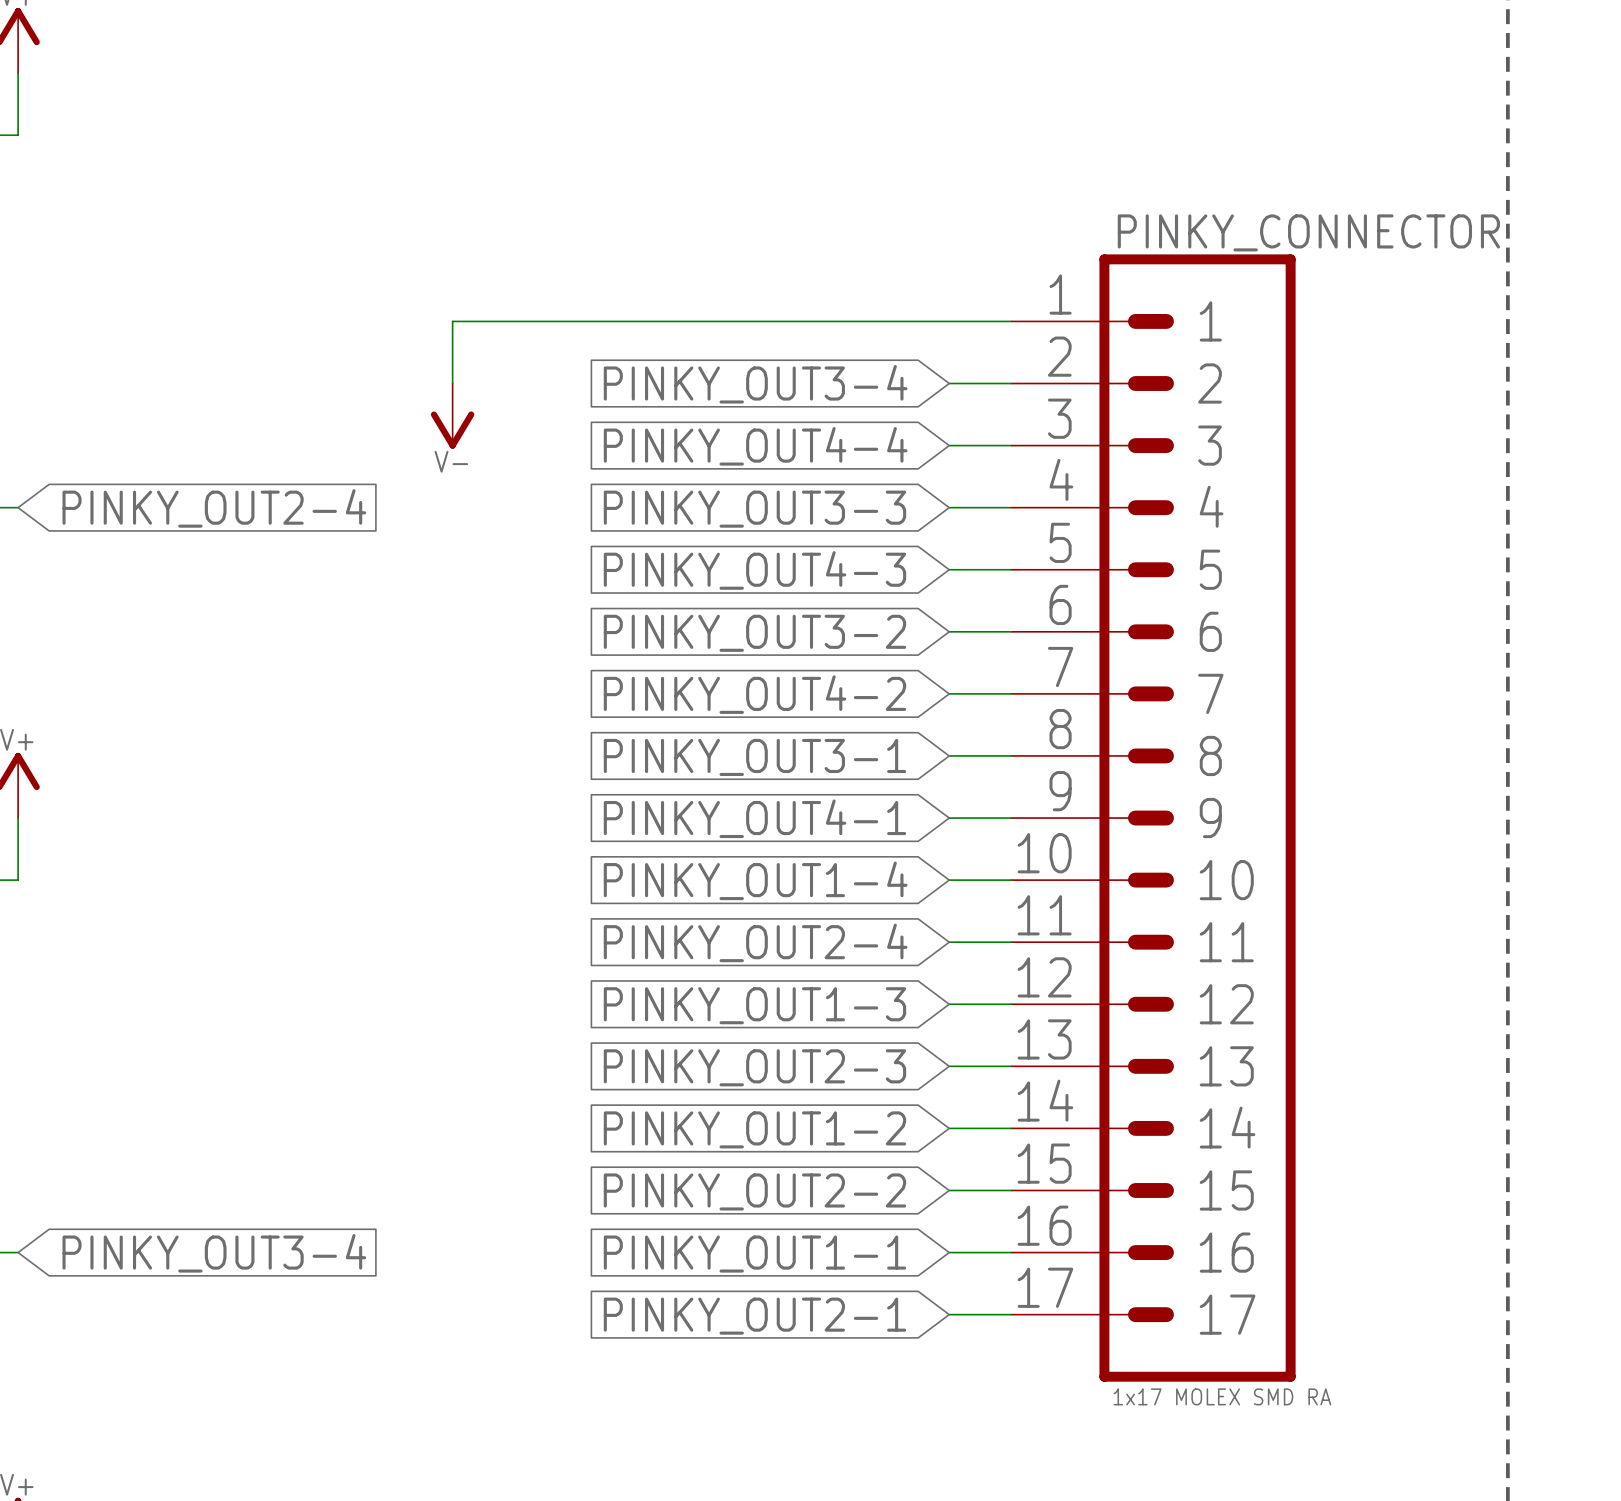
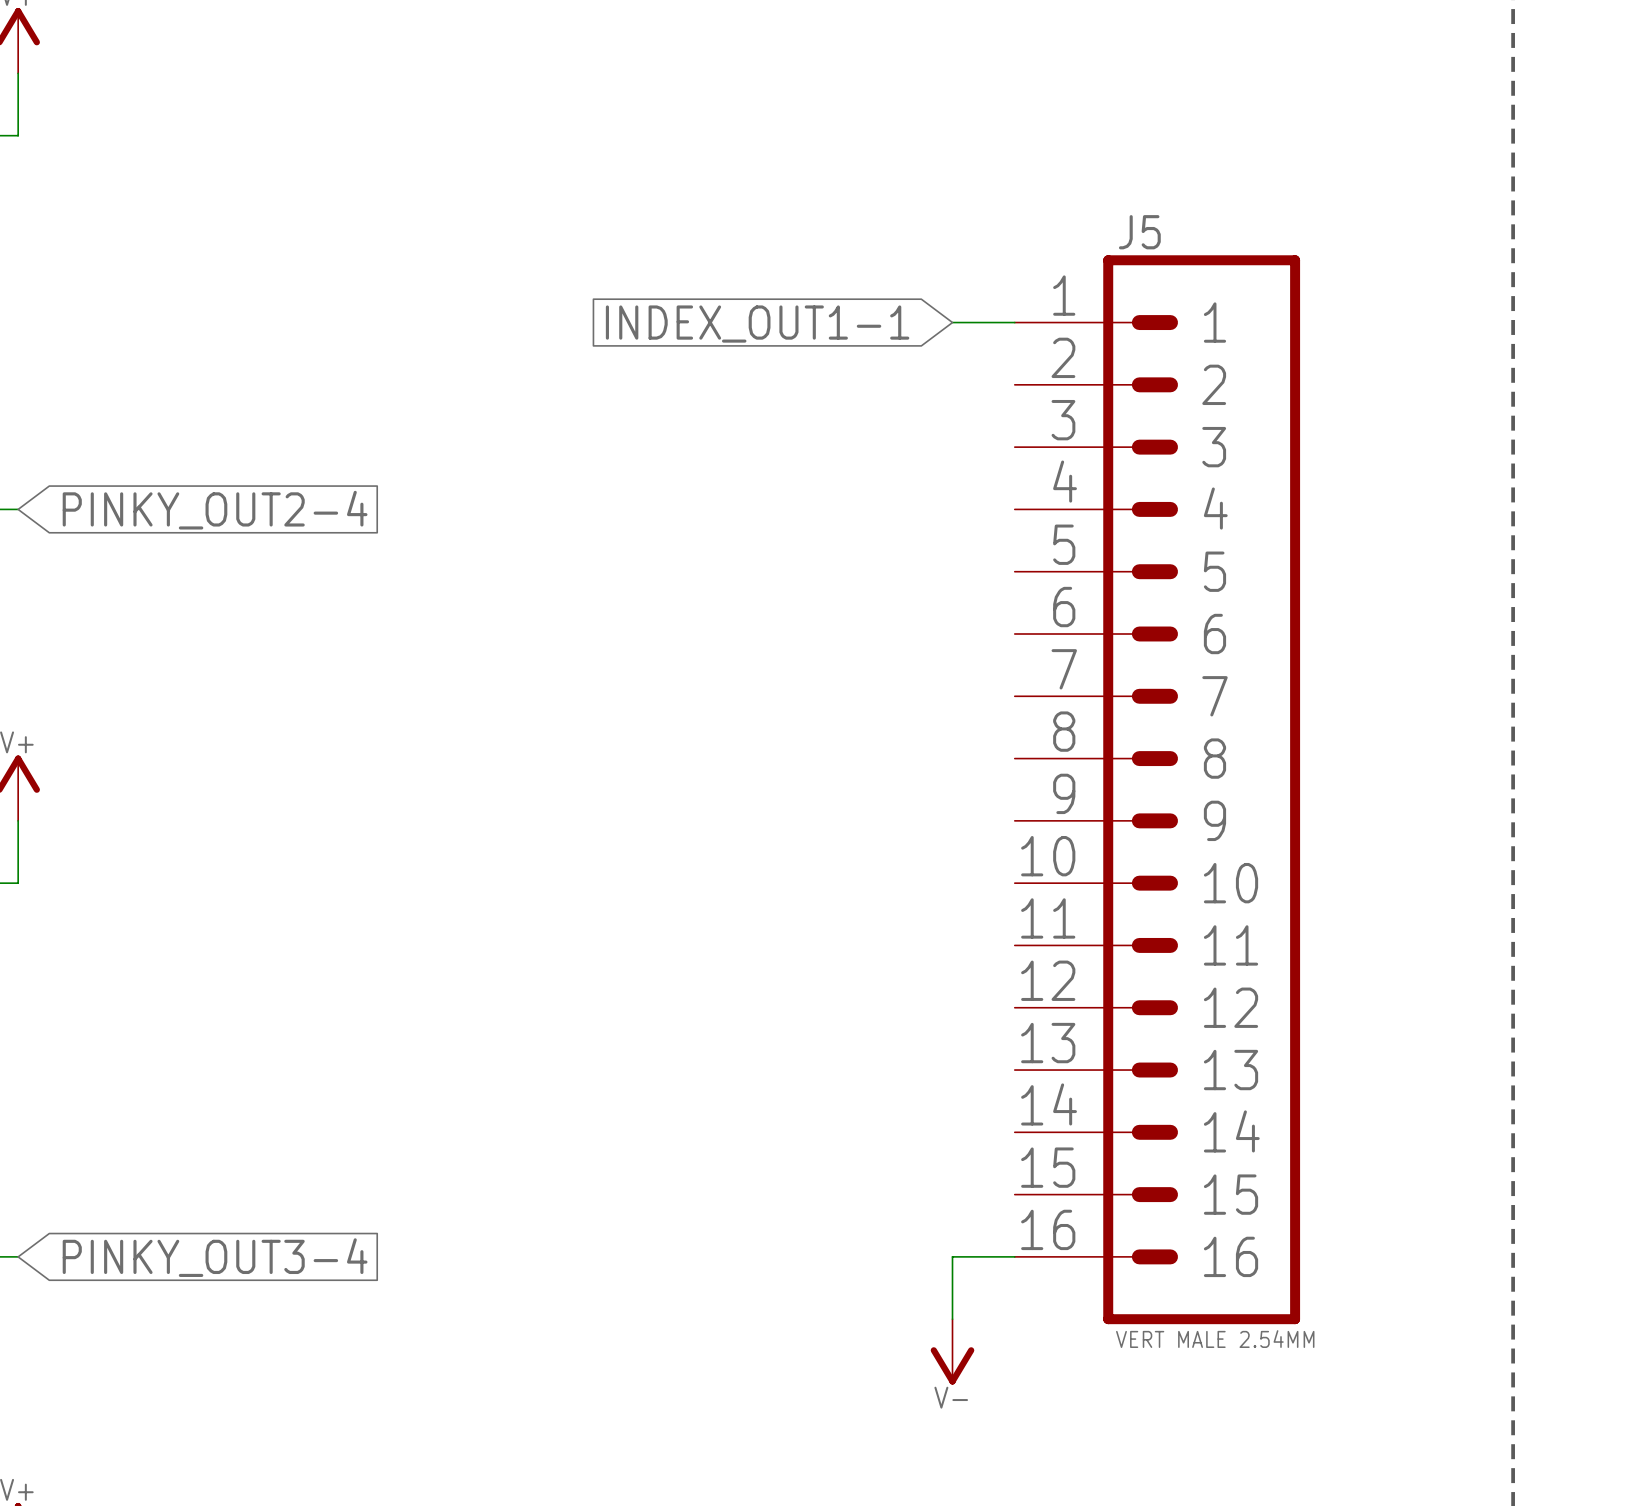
wire: (949, 321) (452, 321) (452, 383) -> none
global label: none -> INDEX_OUT1-1 (757, 324)
wire: (949, 383) (1011, 383) -> none
global label: PINKY_OUT3-4 (755, 384) -> none
power symbol: (452, 416) -> none
wire: (949, 445) (1011, 445) -> none
global label: PINKY_OUT4-4 (755, 446) -> none
wire: (949, 507) (1011, 507) -> none
global label: PINKY_OUT3-3 (754, 509) -> none
wire: (949, 569) (1011, 569) -> none
global label: PINKY_OUT4-3 (754, 570) -> none
wire: (949, 631) (1011, 631) -> none
global label: PINKY_OUT3-2 (754, 633) -> none
wire: (949, 693) (1011, 693) -> none
global label: PINKY_OUT4-2 (754, 694) -> none
wire: (949, 755) (1011, 755) -> none
global label: PINKY_OUT3-1 (754, 757) -> none
J5: none -> VERT MALE 2.54MM (1157, 789)
global label: PINKY_OUT4-1 (754, 818) -> none
wire: (949, 818) (1011, 818) -> none
PINKY_CONNECTOR: 1x17 MOLEX SMD RA (1153, 818) -> none
global label: PINKY_OUT1-4 (755, 880) -> none
wire: (949, 880) (1011, 880) -> none
global label: PINKY_OUT2-4 (755, 942) -> none
wire: (949, 942) (1011, 942) -> none
wire: (949, 1004) (1011, 1004) -> none
global label: PINKY_OUT1-3 (754, 1005) -> none
wire: (949, 1066) (1011, 1066) -> none
global label: PINKY_OUT2-3 (754, 1067) -> none
wire: (949, 1128) (1011, 1128) -> none
global label: PINKY_OUT1-2 (754, 1129) -> none
wire: (949, 1190) (1011, 1190) -> none
global label: PINKY_OUT2-2 (754, 1191) -> none
global label: PINKY_OUT1-1 (754, 1254) -> none
wire: (949, 1314) (1011, 1314) -> (952, 1319) (952, 1256)
global label: PINKY_OUT2-1 (754, 1316) -> none
power symbol: none -> (952, 1351)

